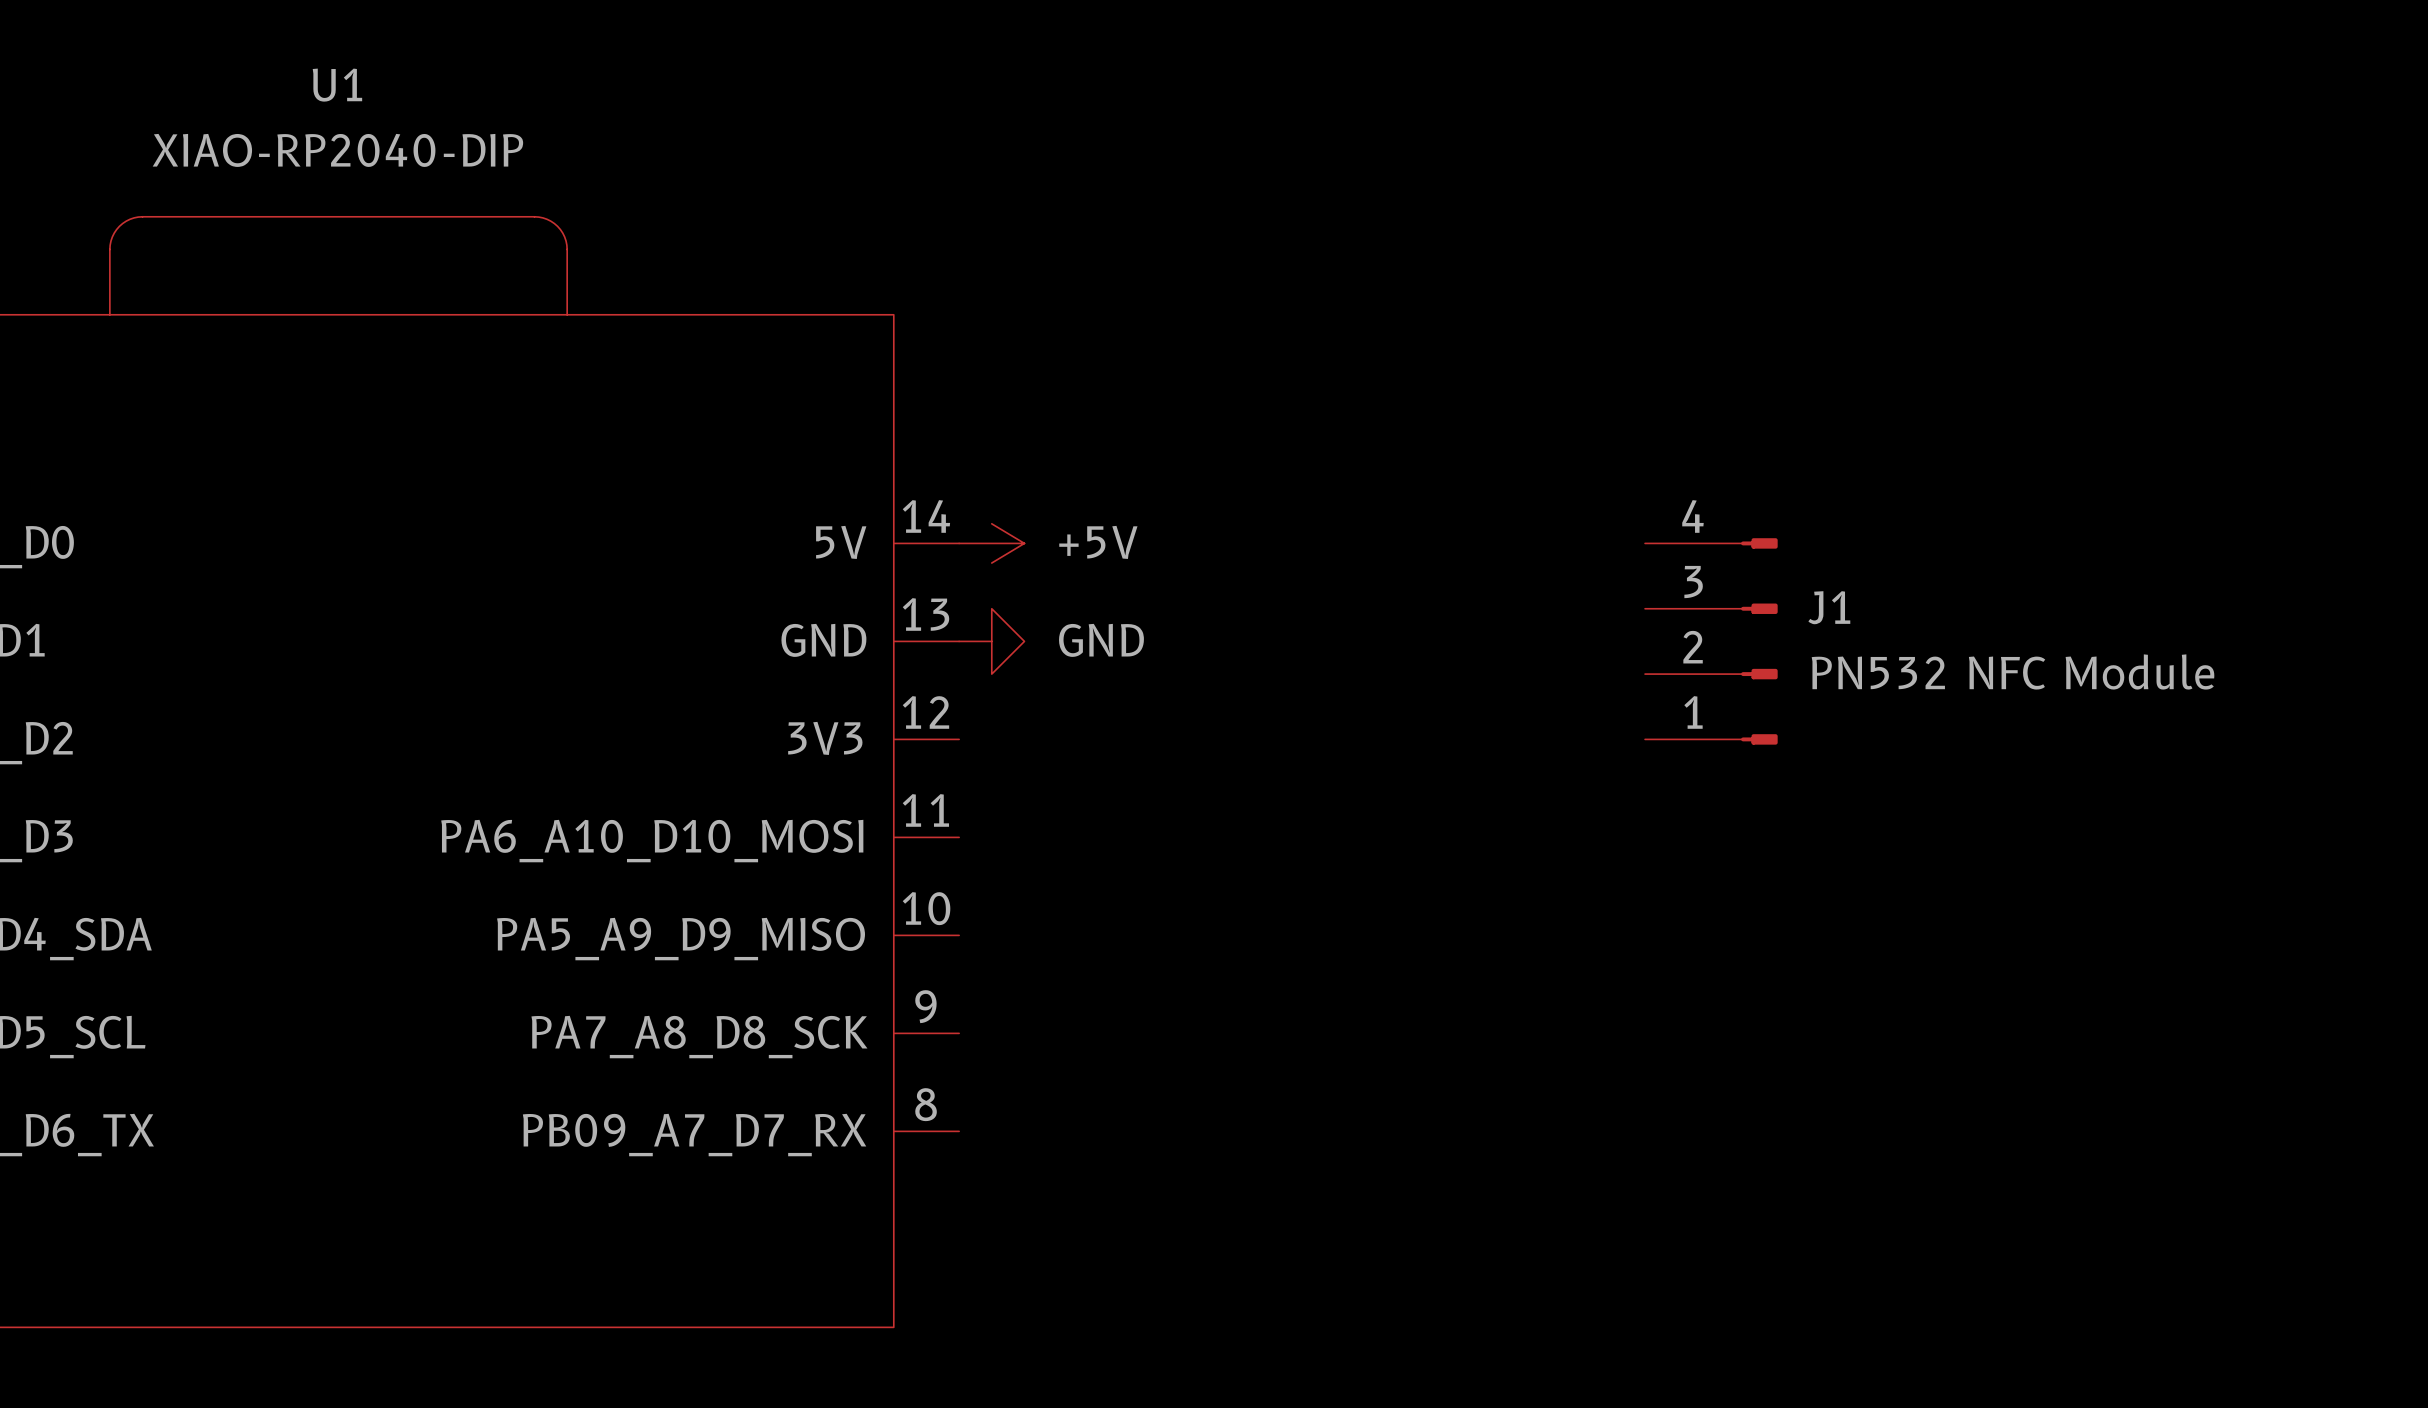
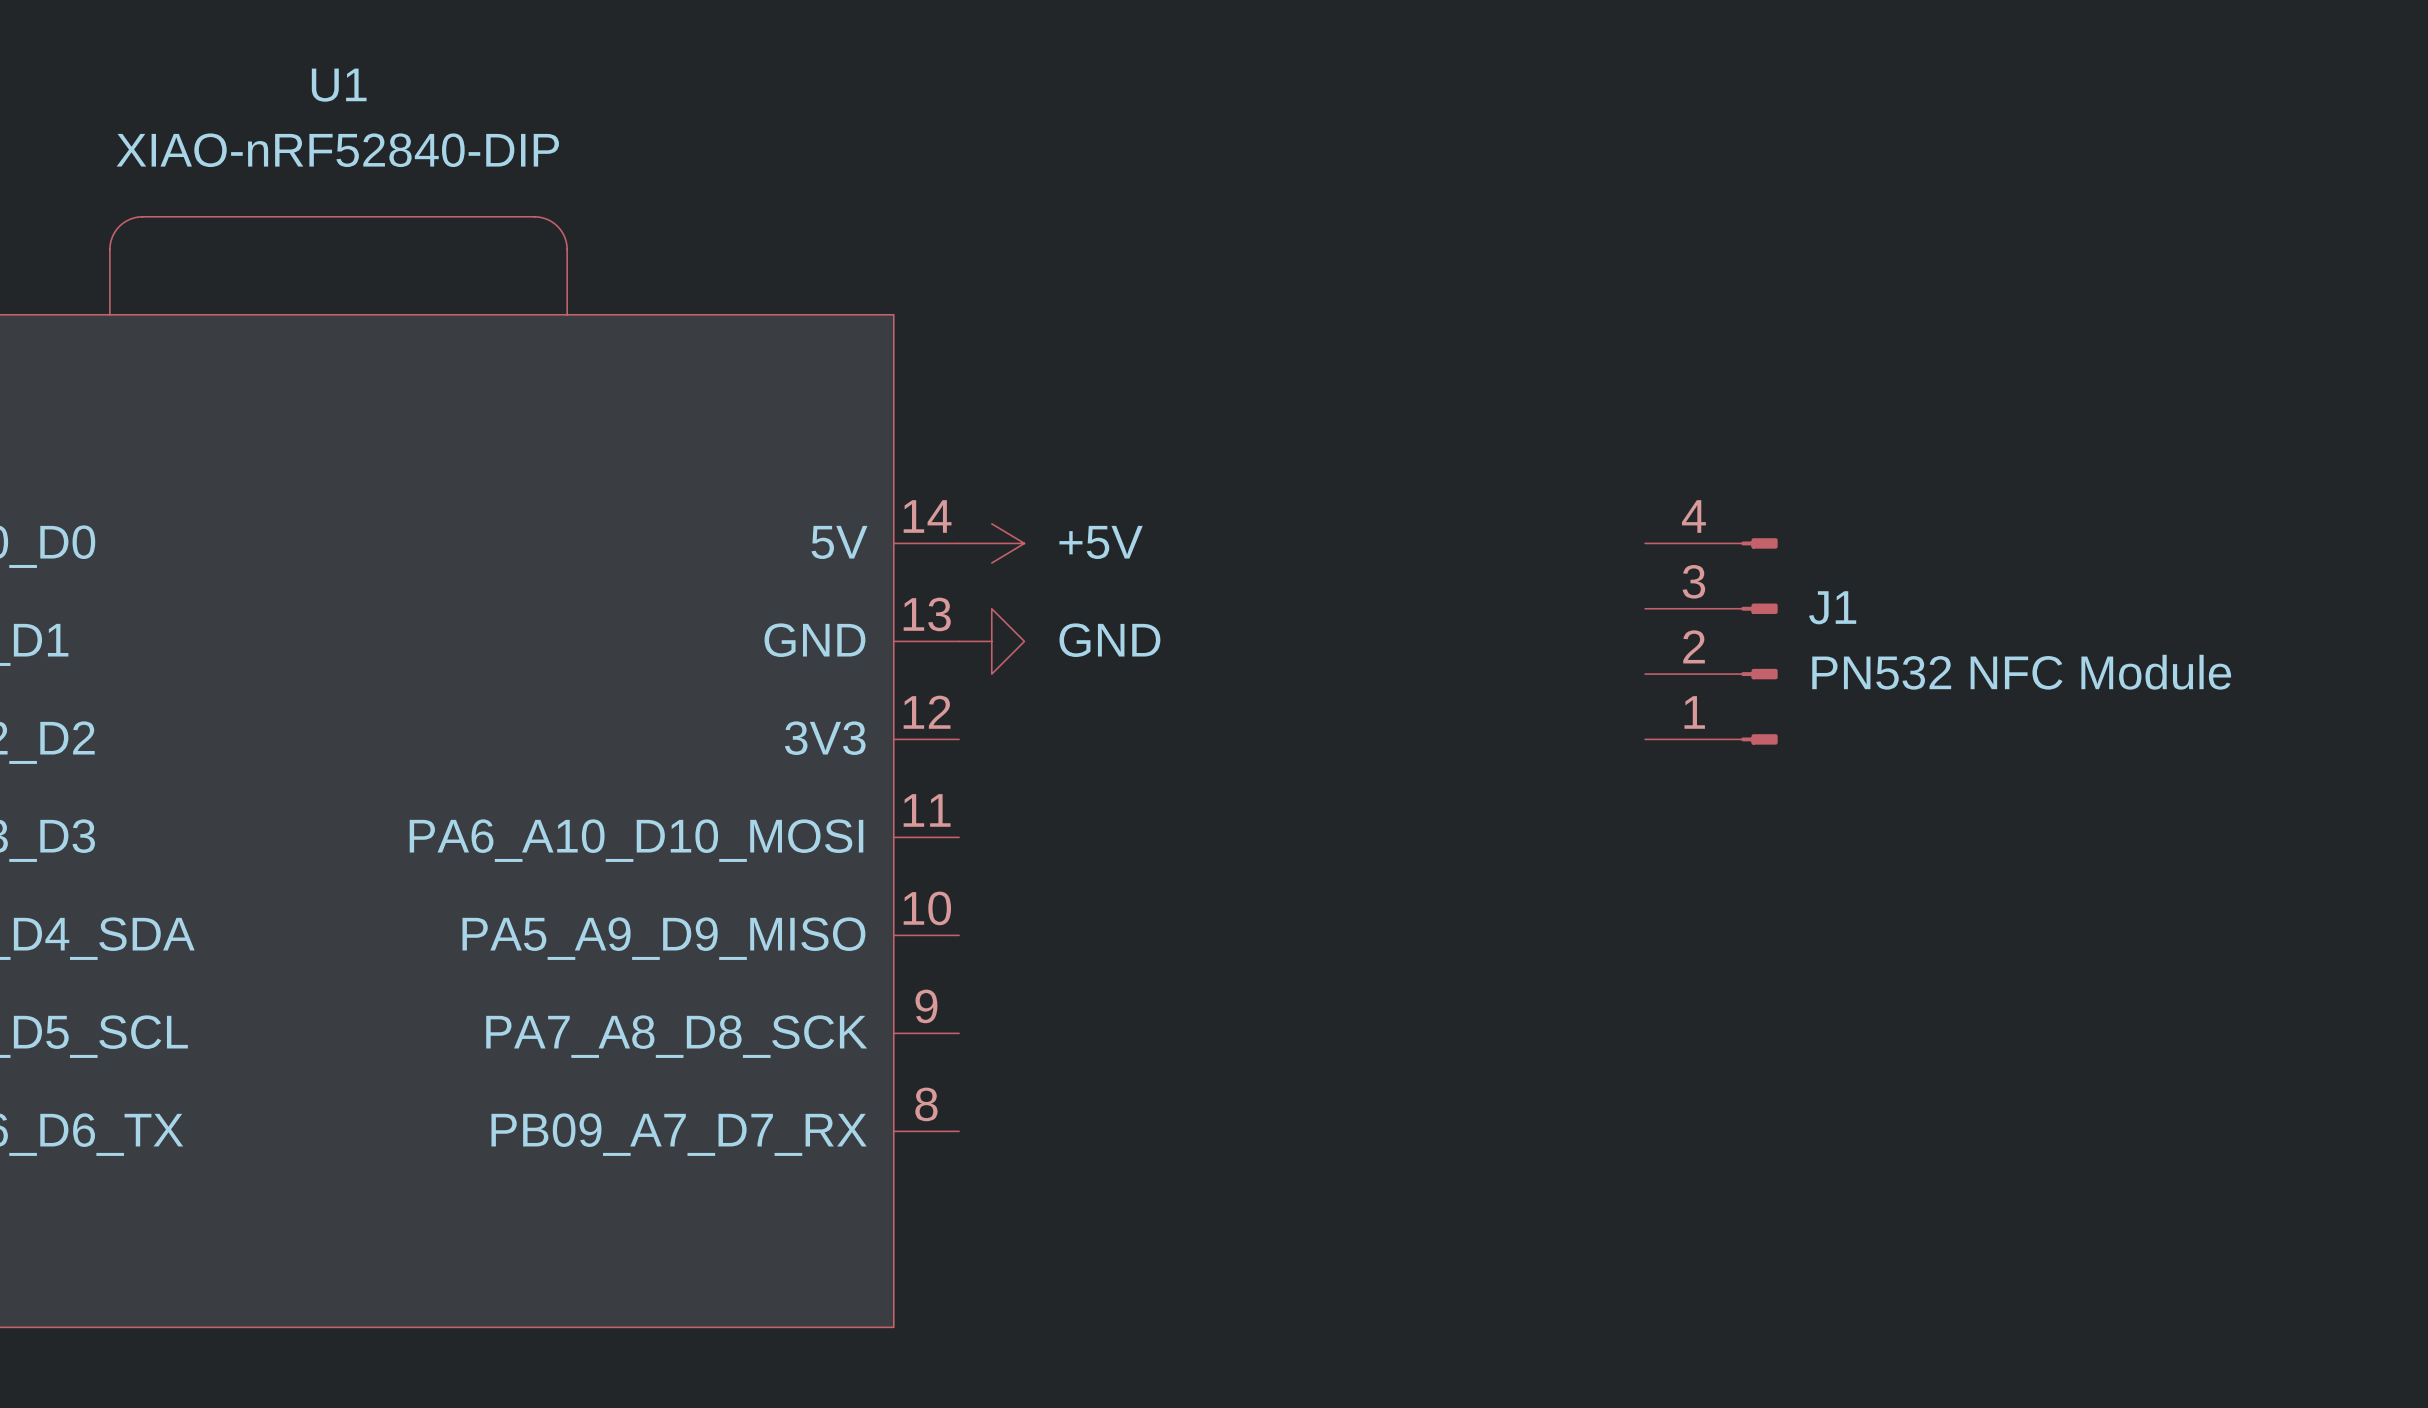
U1 value: XIAO-RP2040-DIP (337, 150) -> XIAO-nRF52840-DIP (337, 150)

